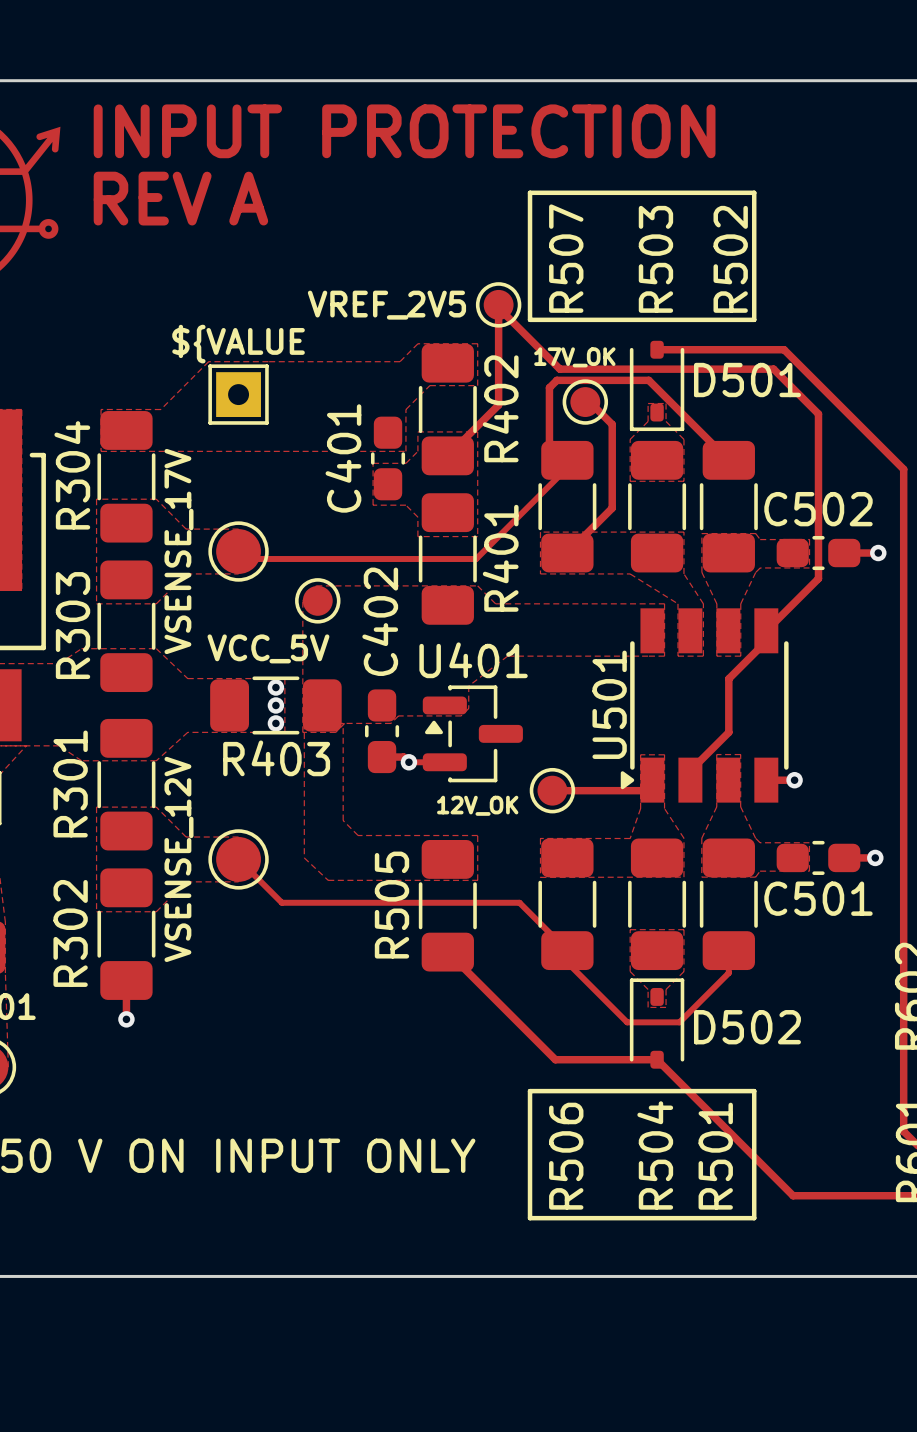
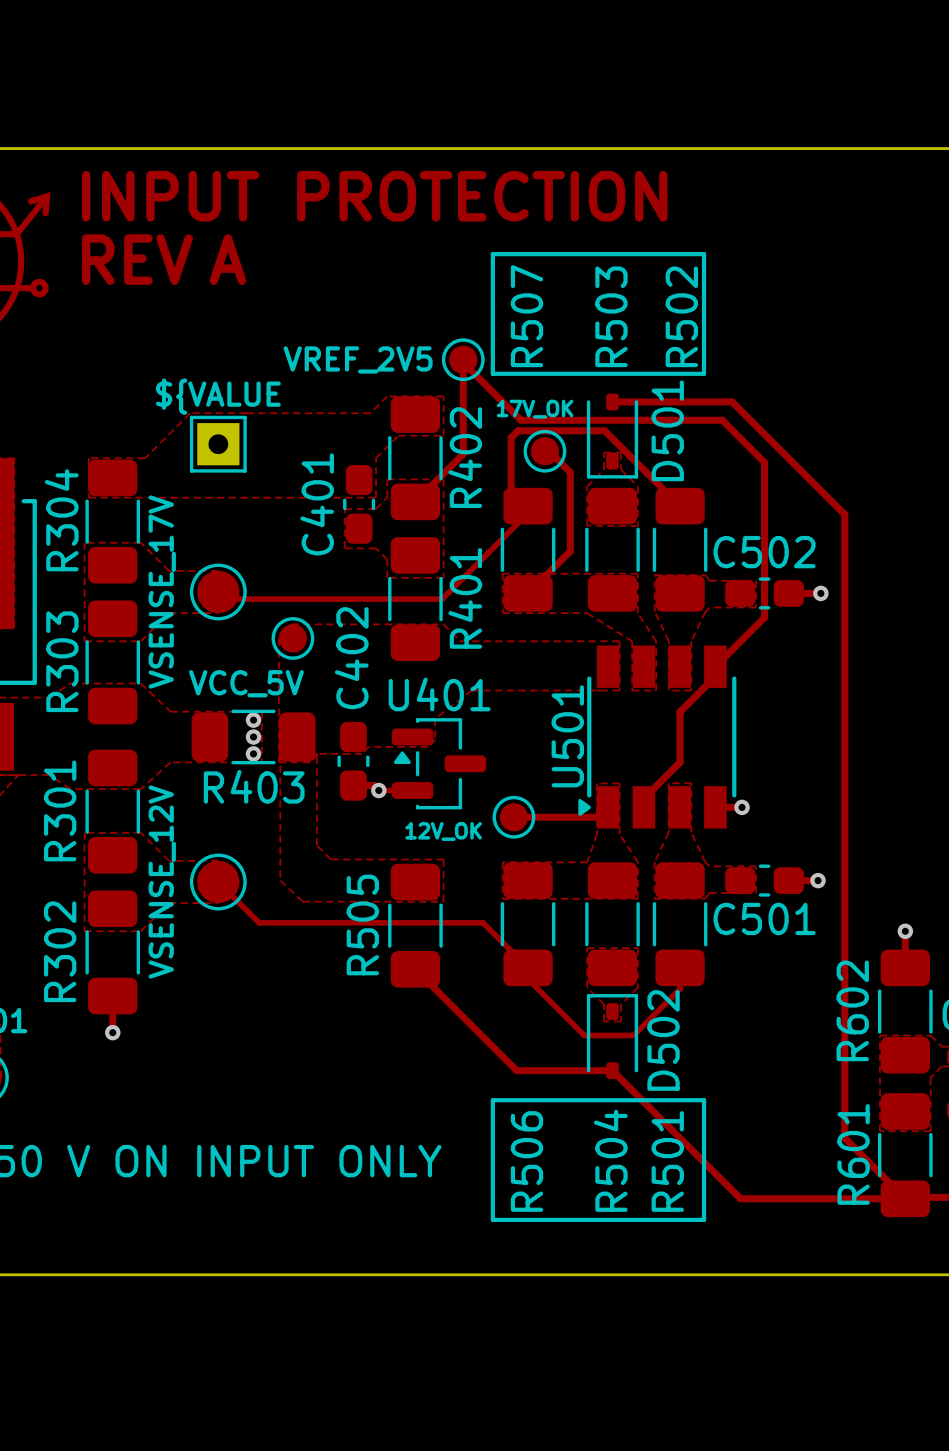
D501 name rotation: 0° (747, 380) -> 90° counterclockwise (667, 430)
D502 name rotation: 0° (747, 1027) -> 90° counterclockwise (663, 1040)

